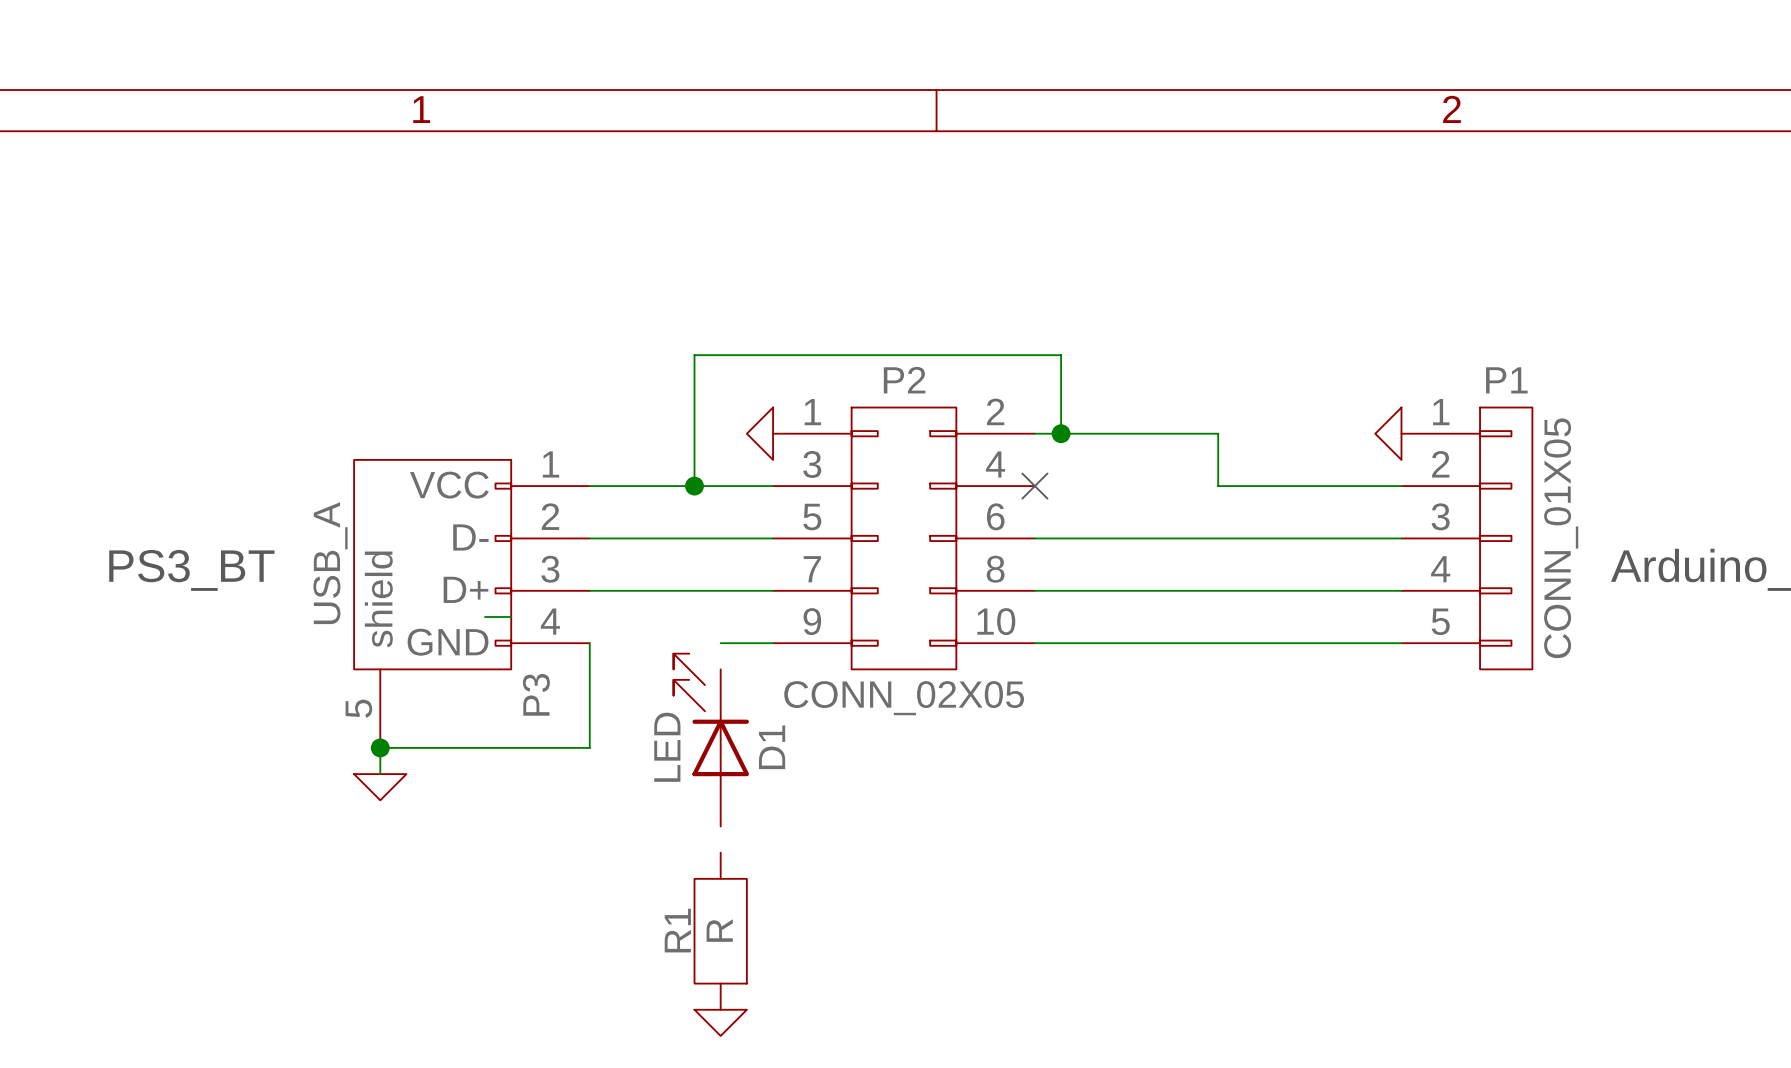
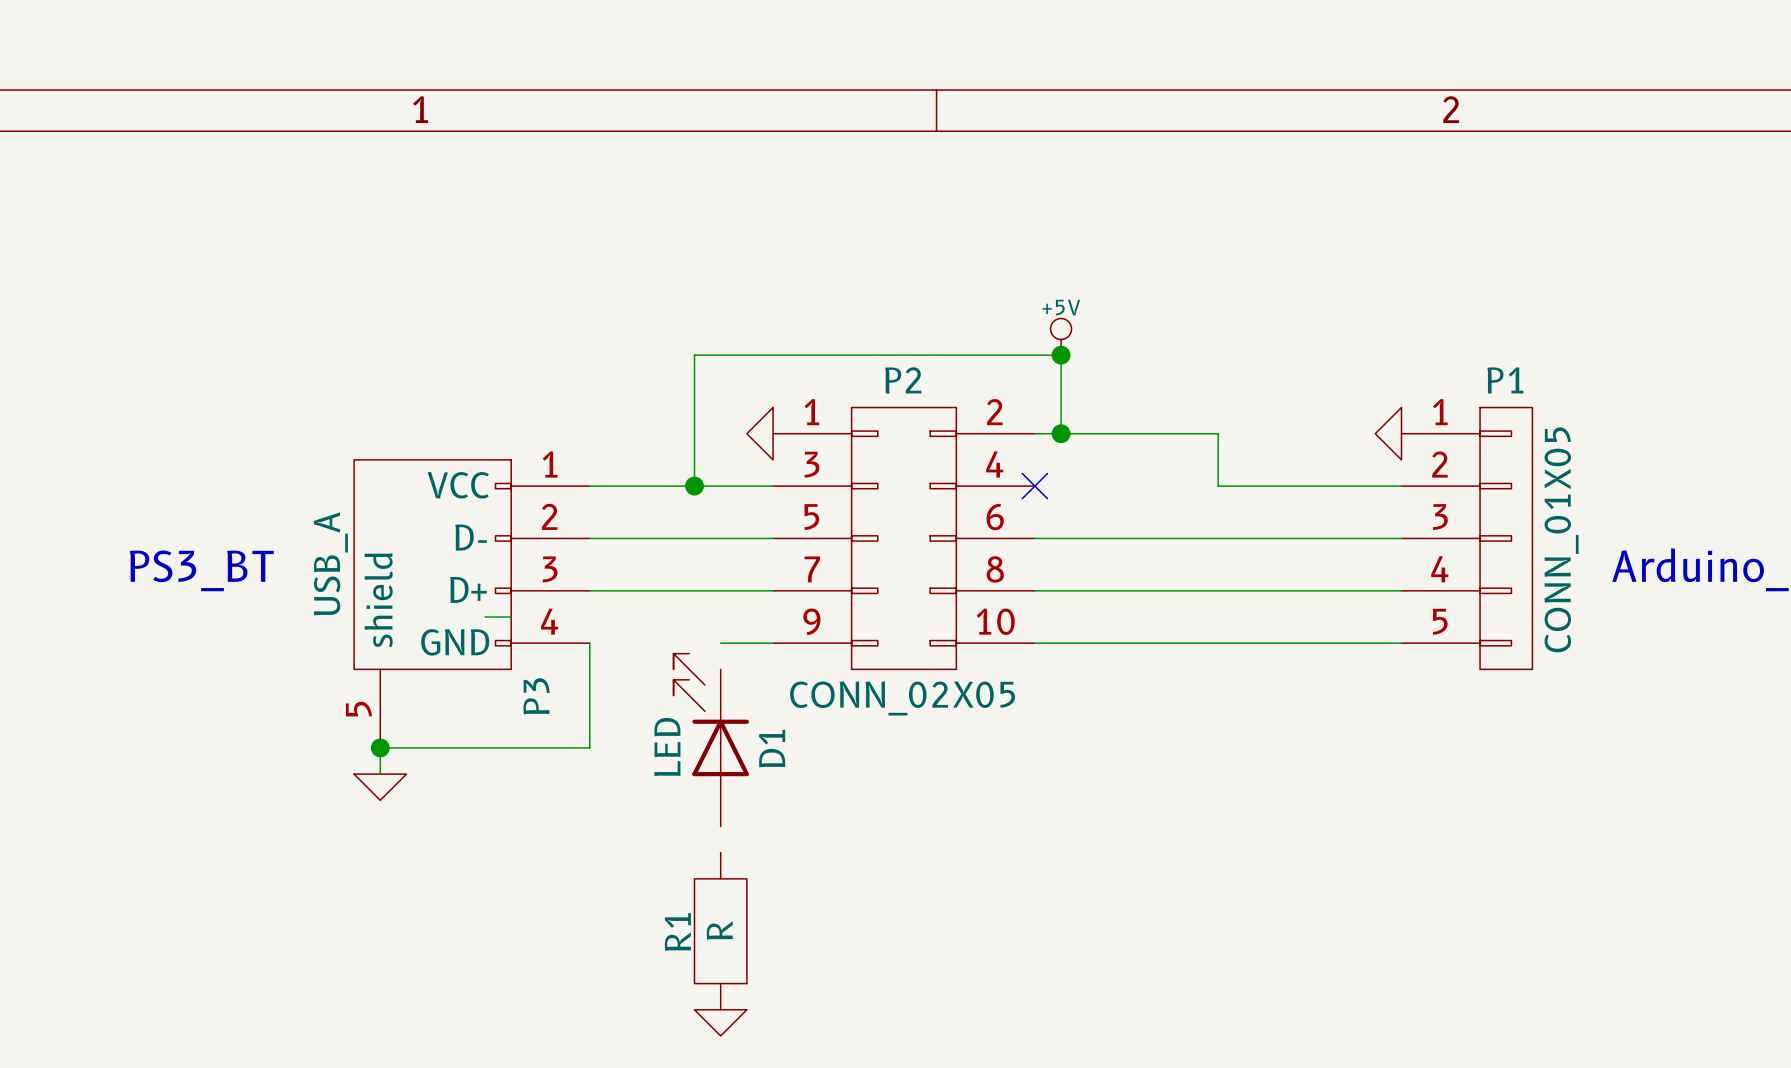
power symbol: none -> +5V (1061, 336)
junction: none -> (1061, 355)

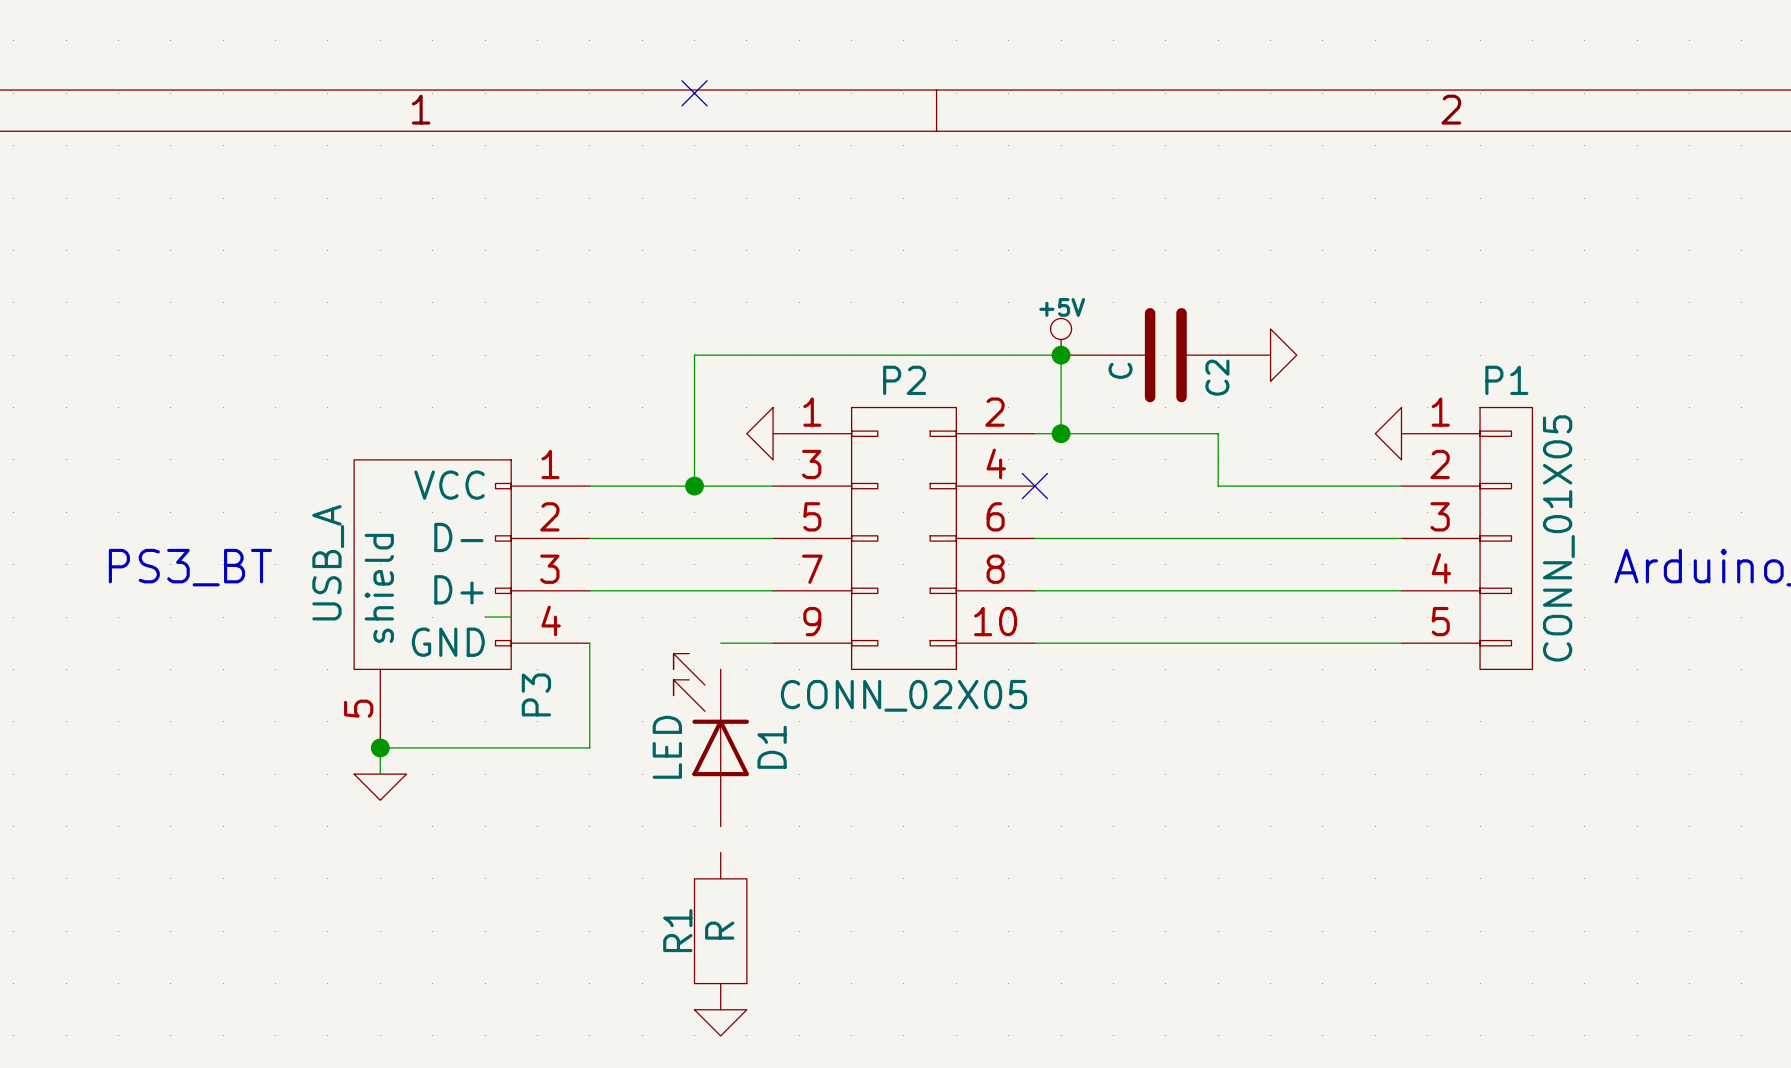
no-connect mark: none -> (694, 93)
C2: none -> C (1165, 355)
power symbol: none -> (1283, 355)

